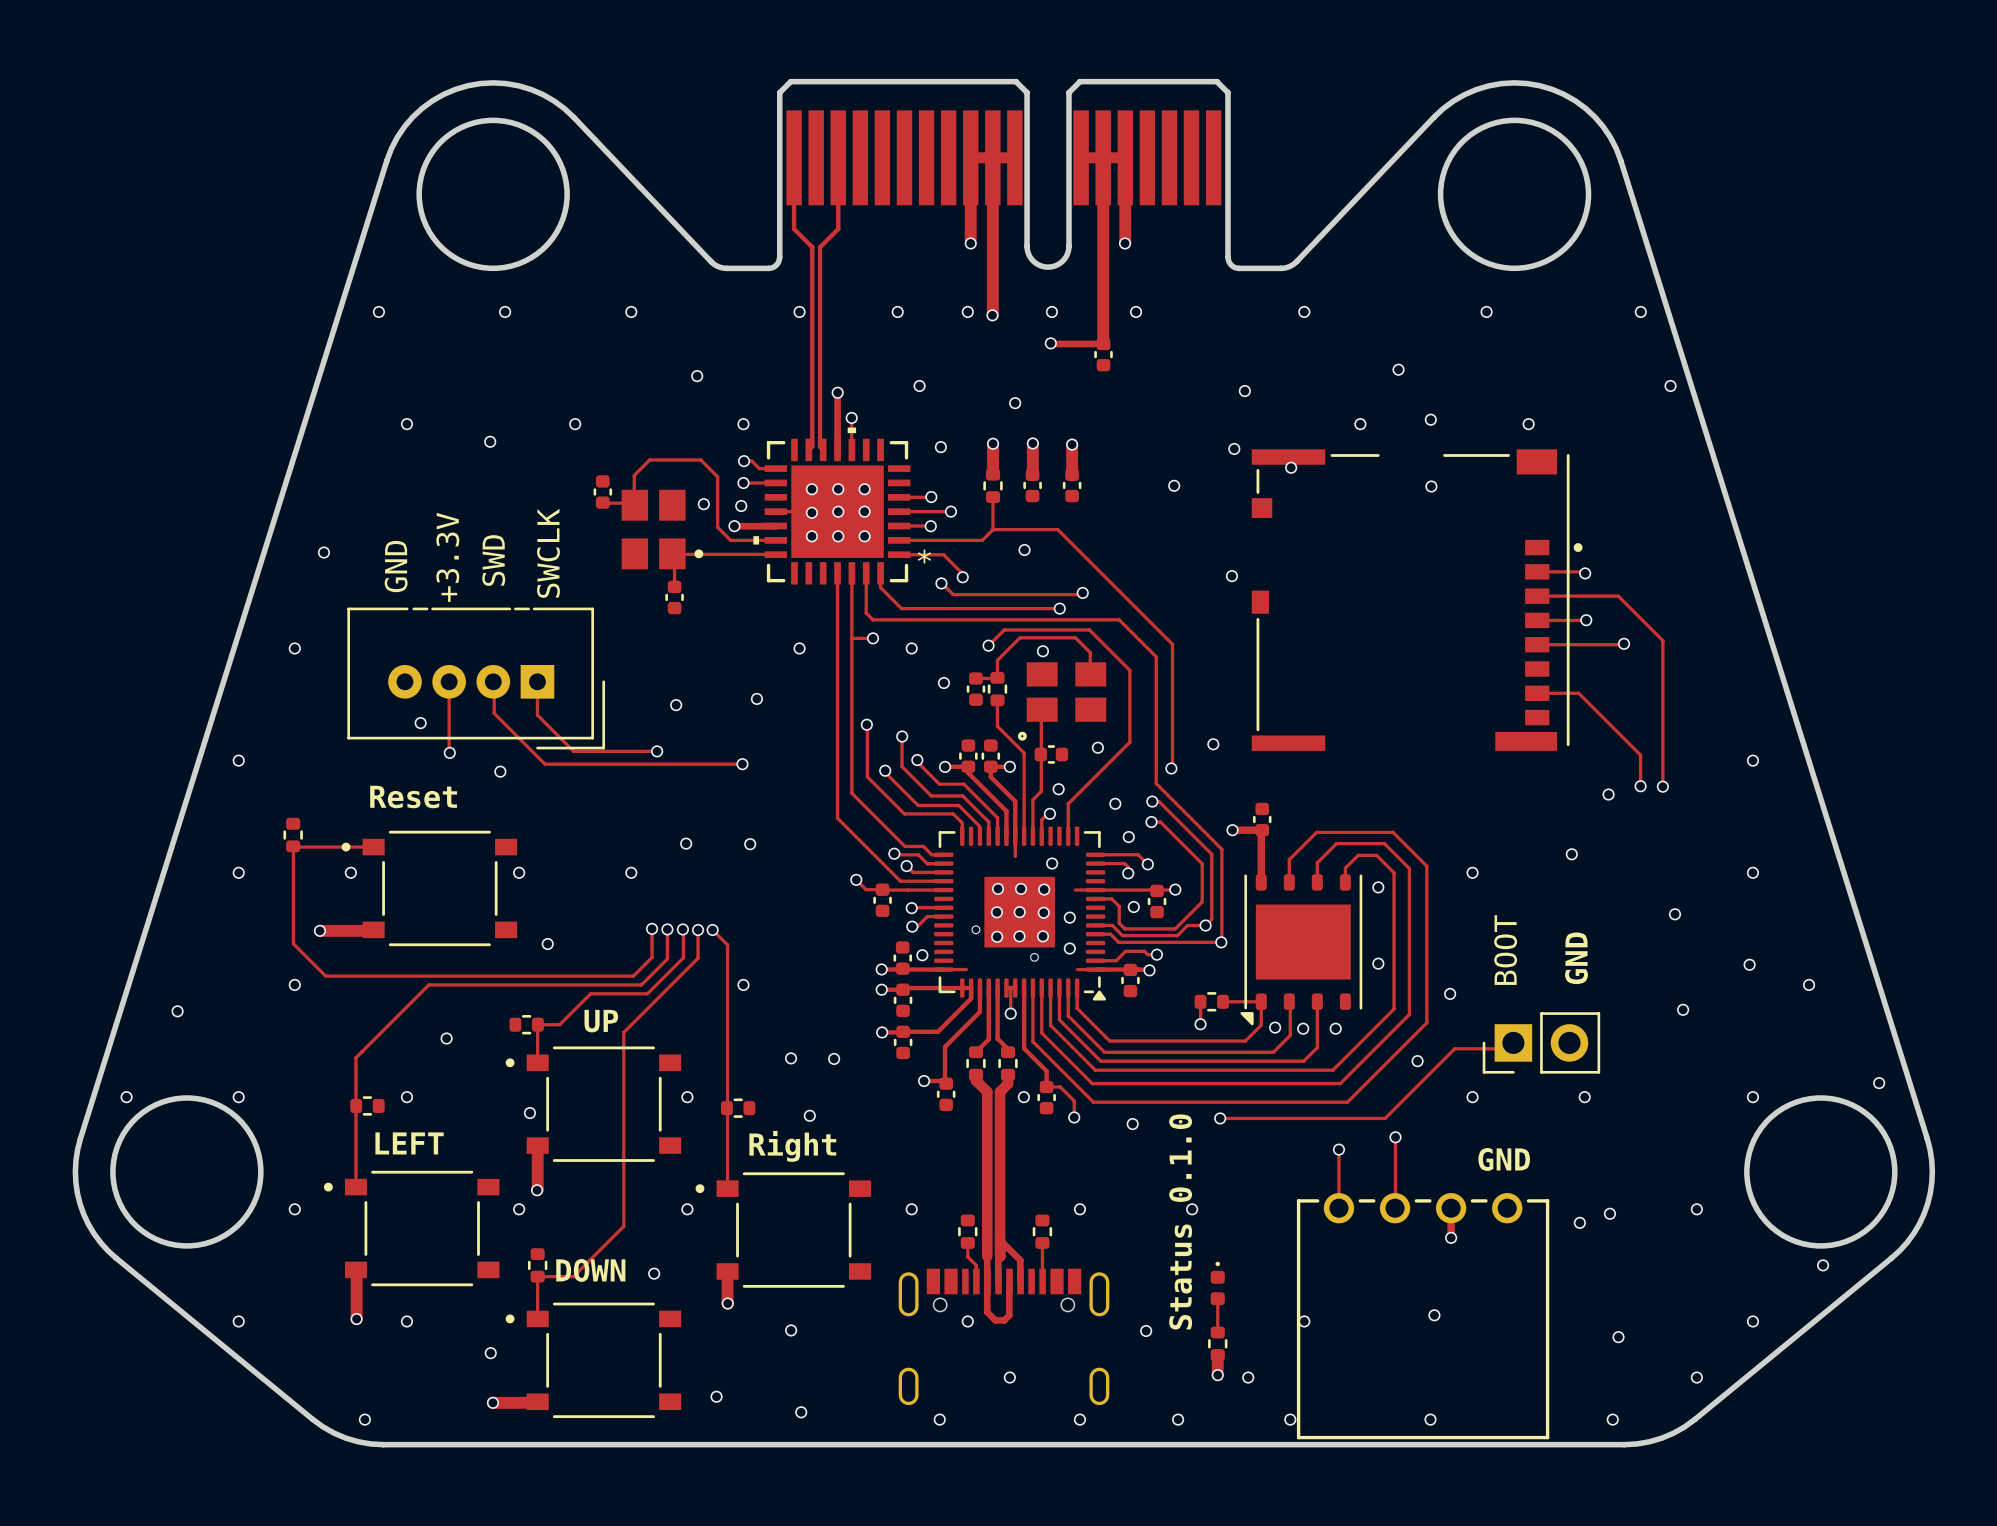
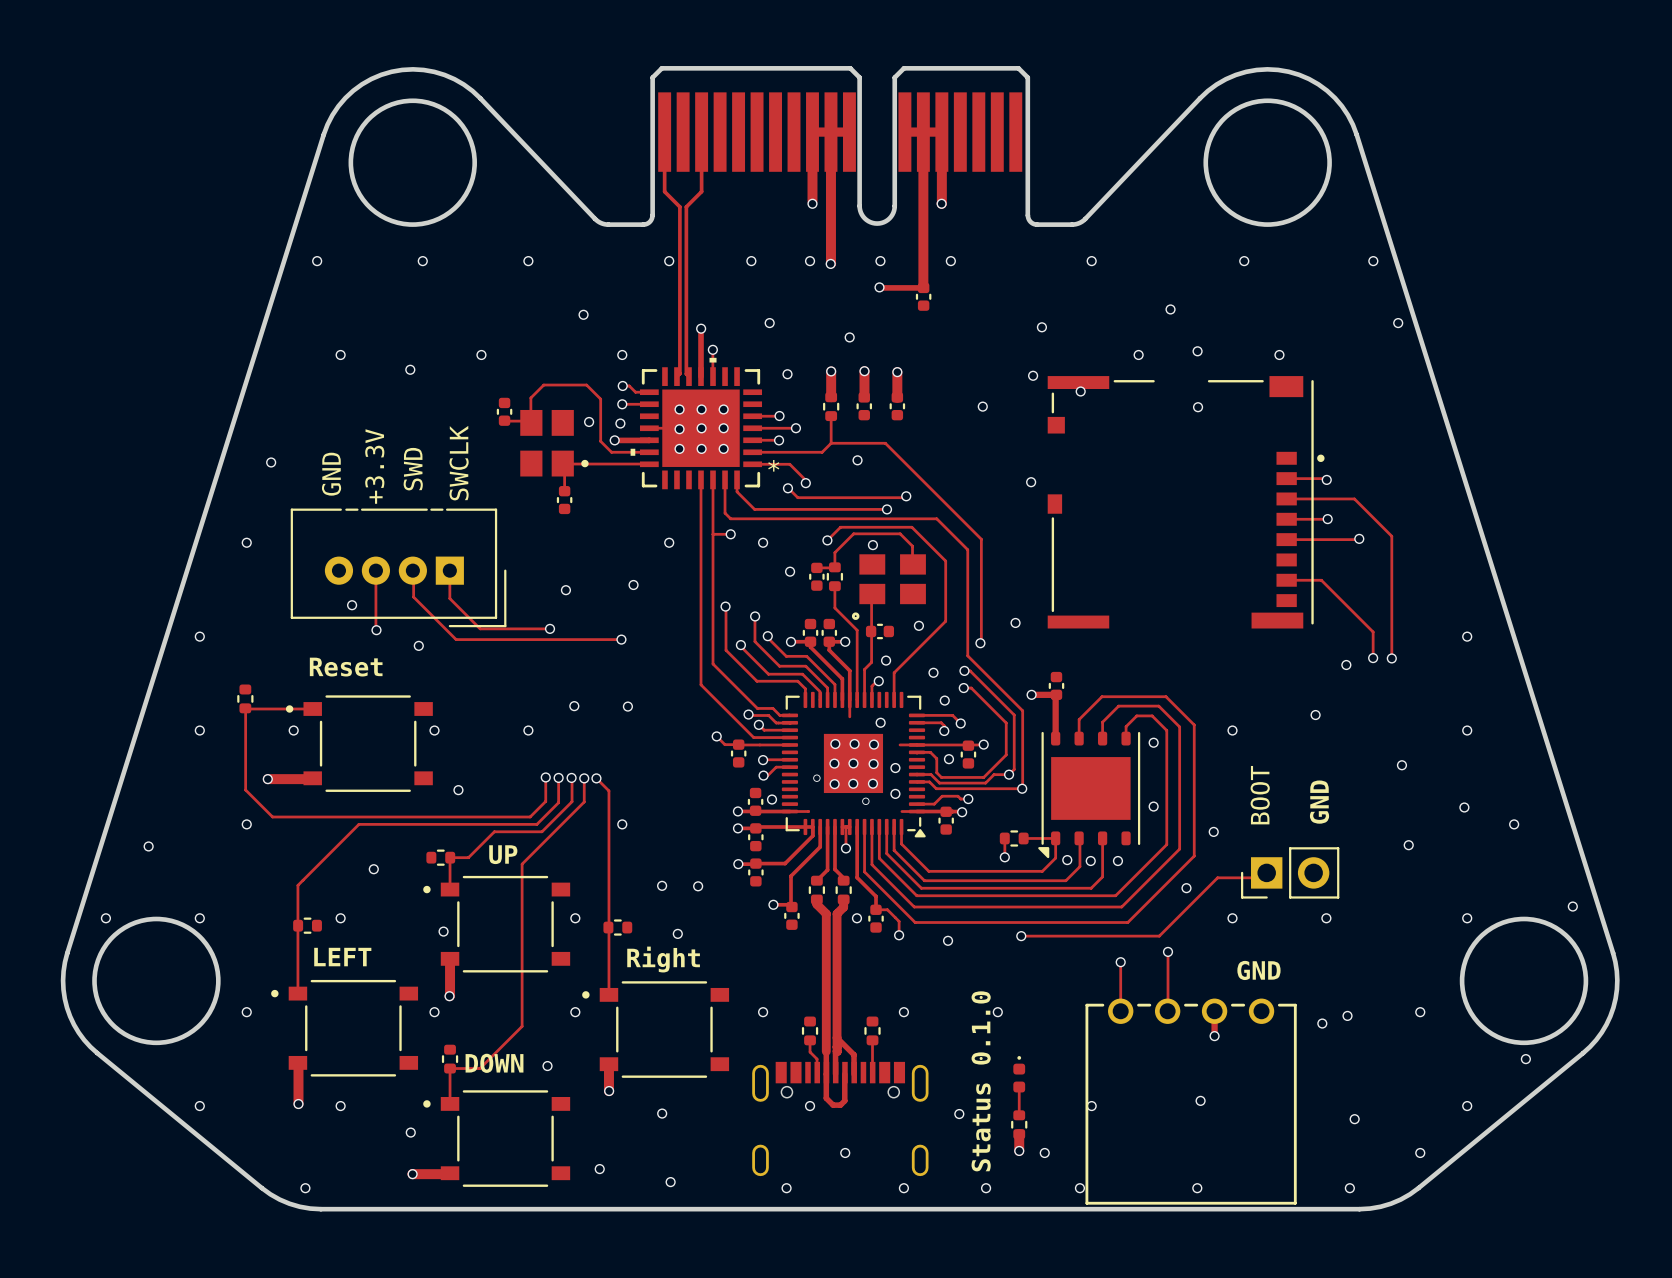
text position: Status 0.1.0 (1180, 1221) -> Status 0.1.0 (981, 1081)

